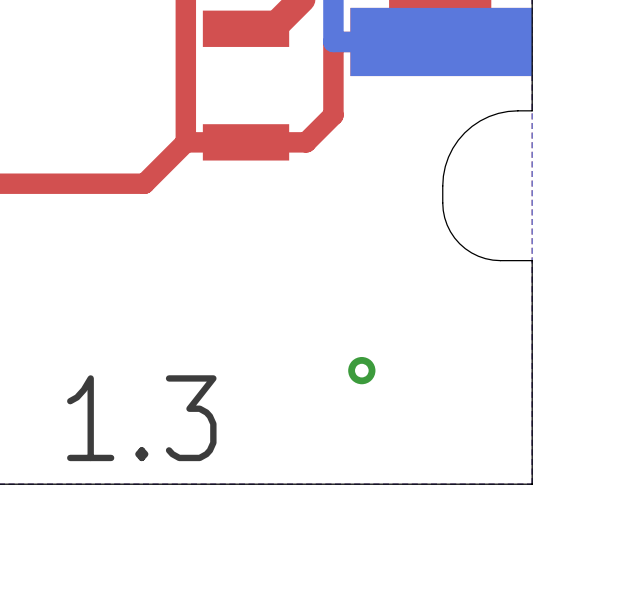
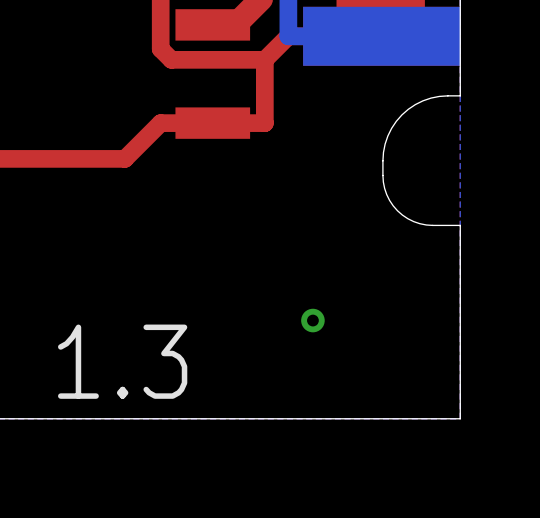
top track: (333, 41) (333, 115) (306, 142) -> (264, 59) (264, 123)
top track: none -> (288, 36) (264, 59)
top track: (185, 56) (185, 142) -> (160, 49) (171, 59) (264, 59)

